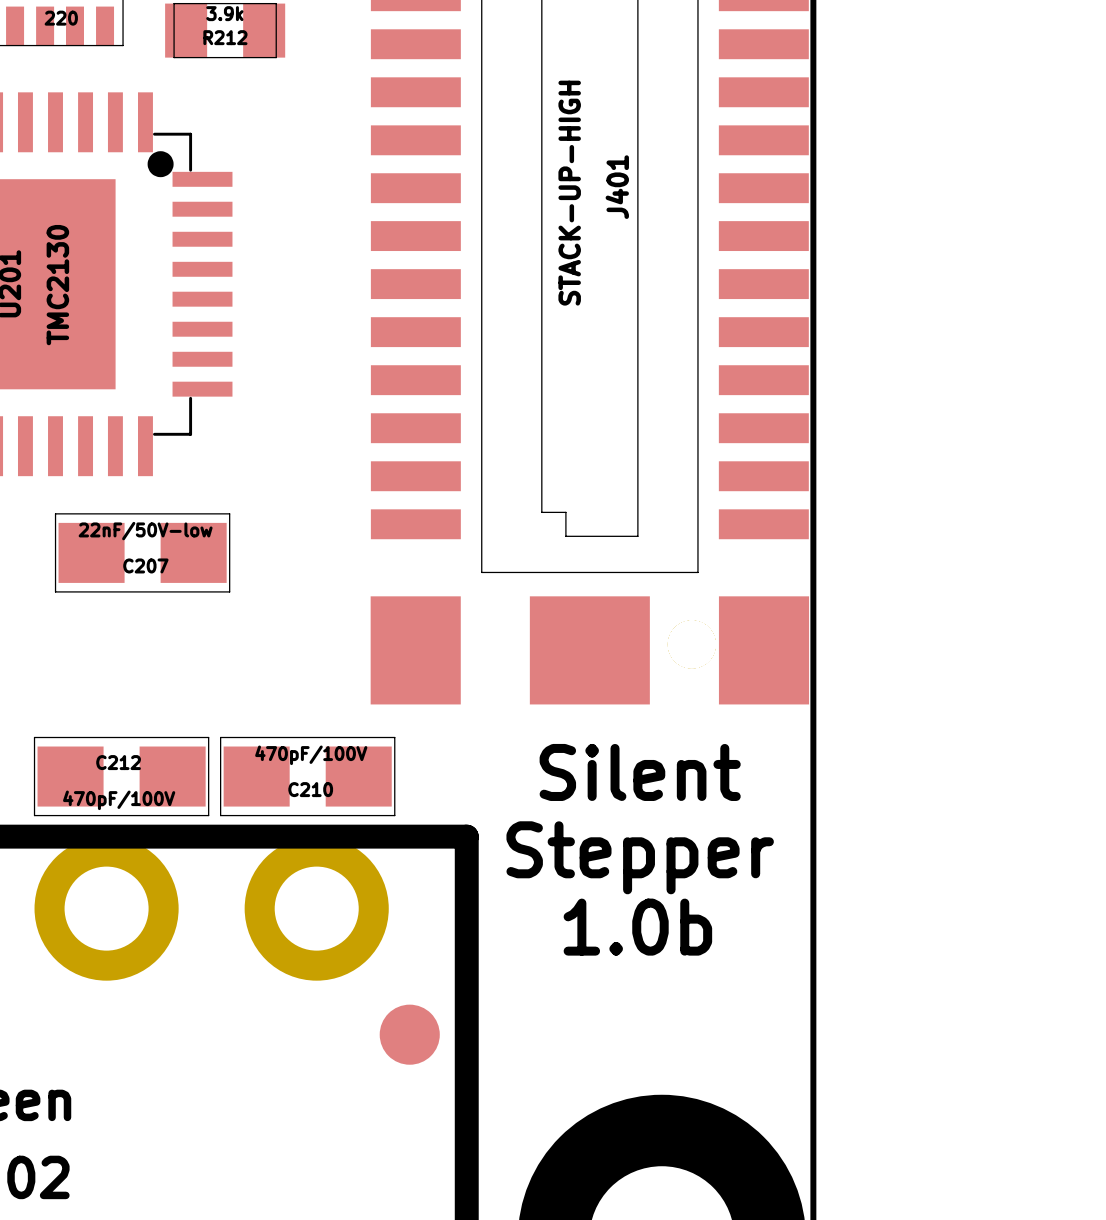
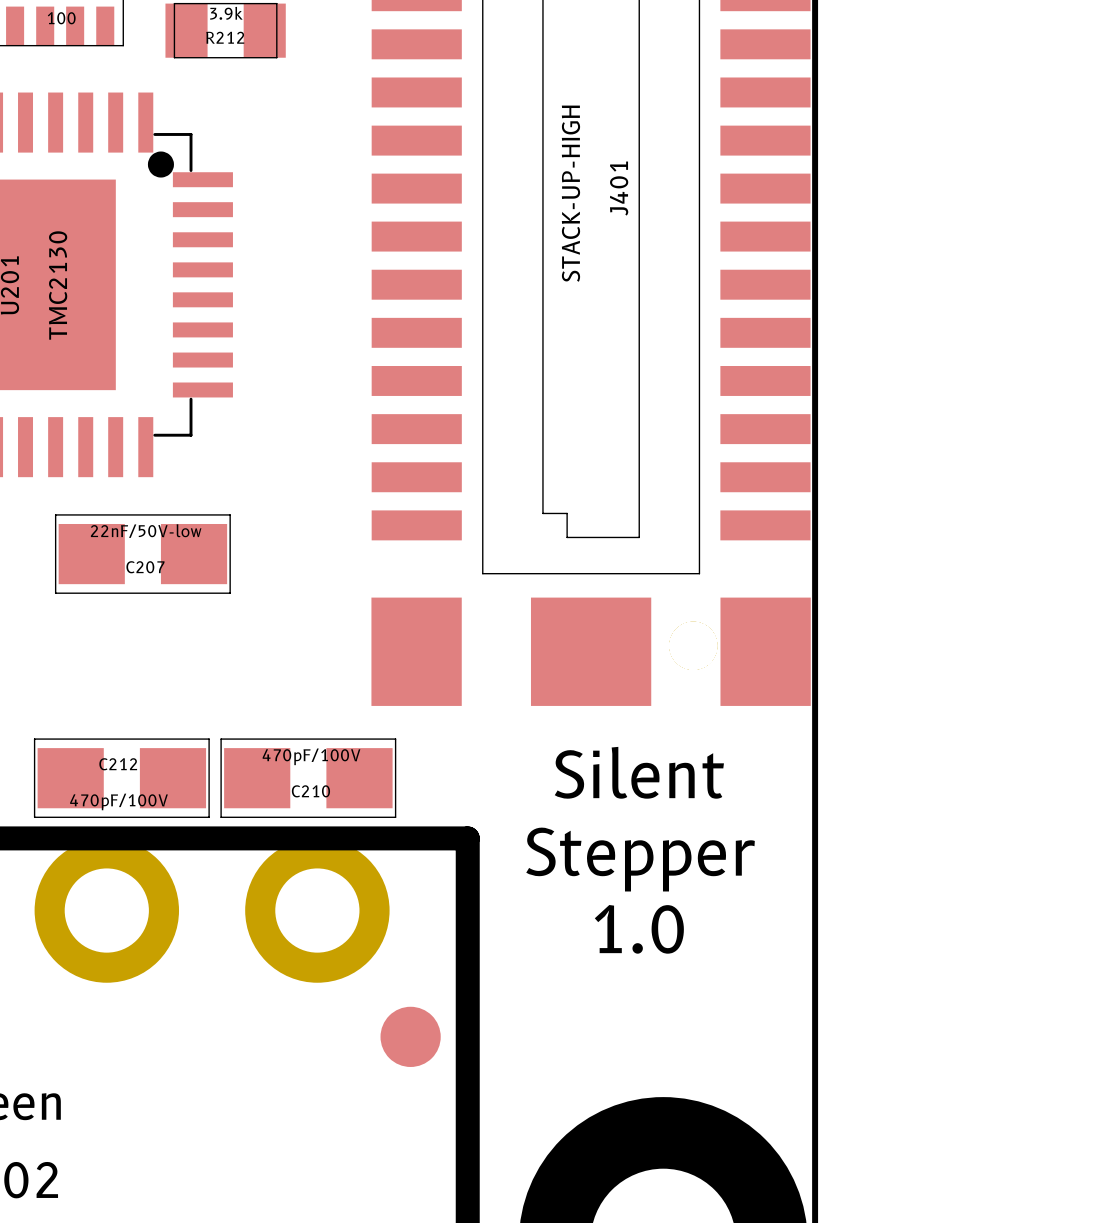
part value: 220 (61, 18) -> 100 (61, 18)
text: 1.0b (637, 927) -> 1.0 (639, 929)

